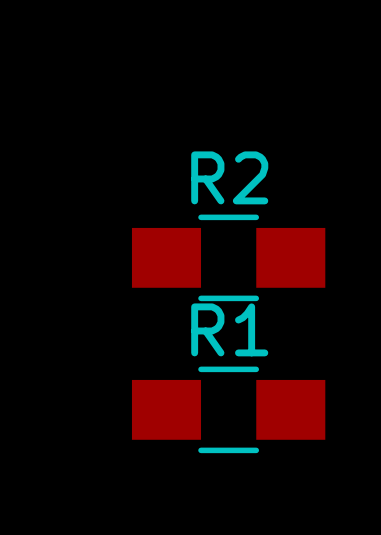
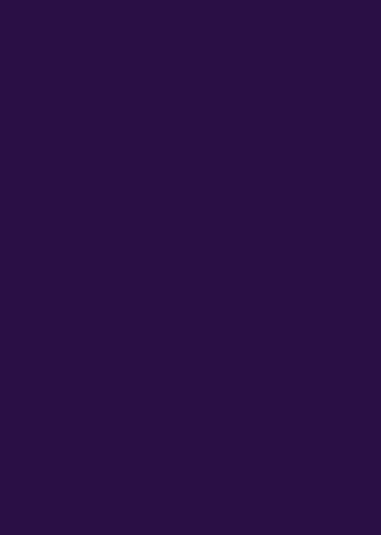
R2: (228, 257) -> none
R1: (228, 409) -> none

